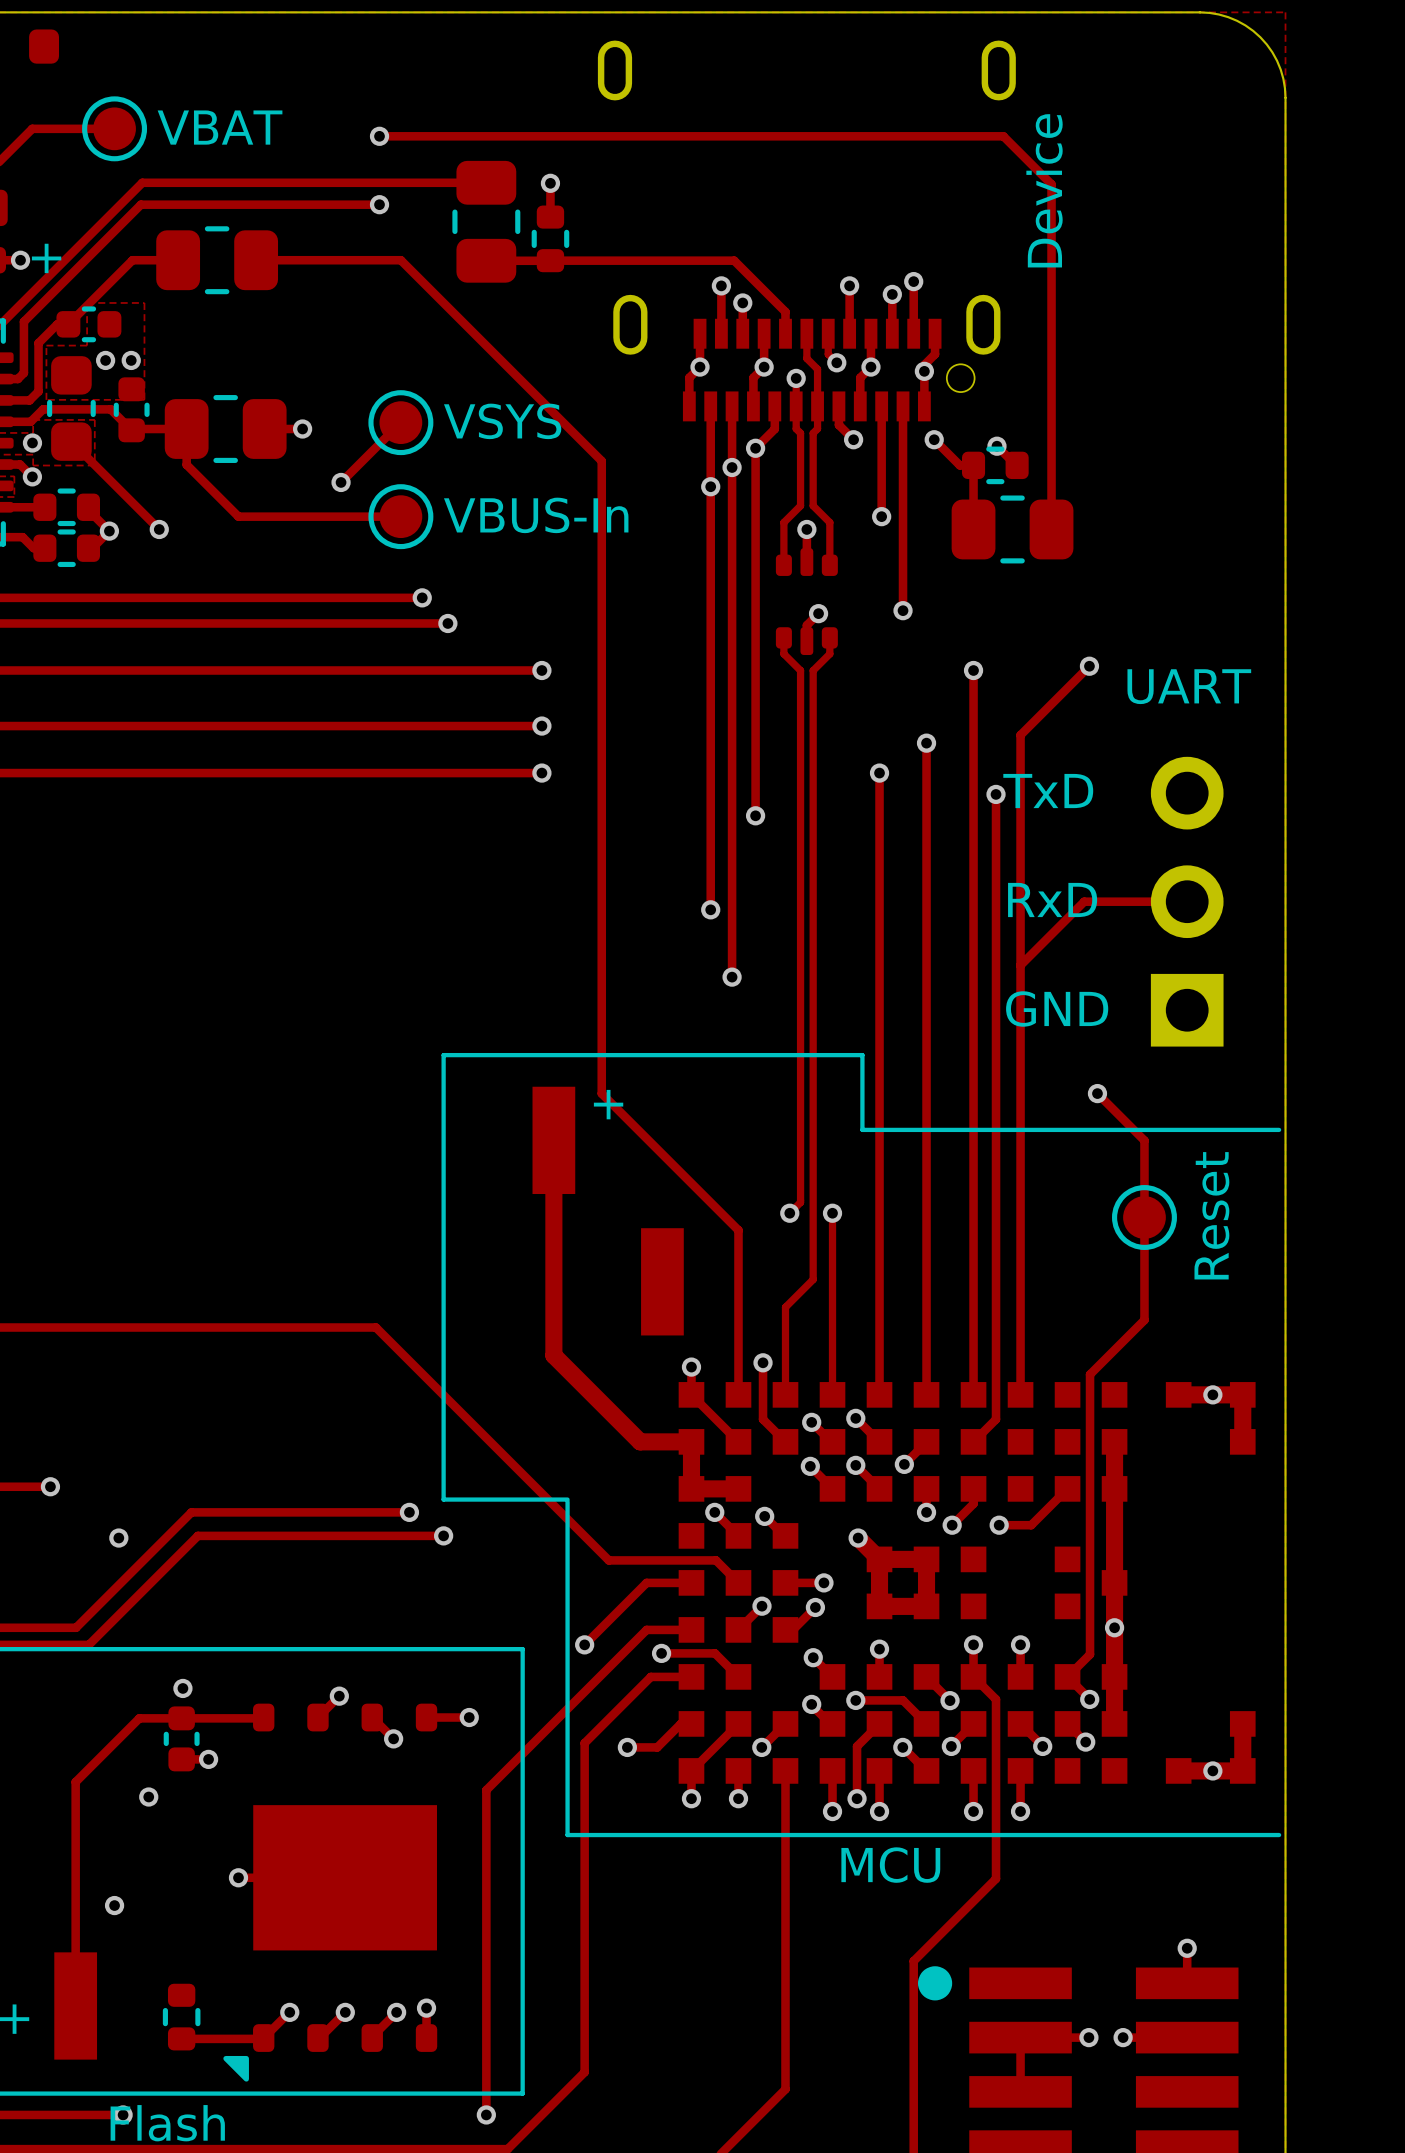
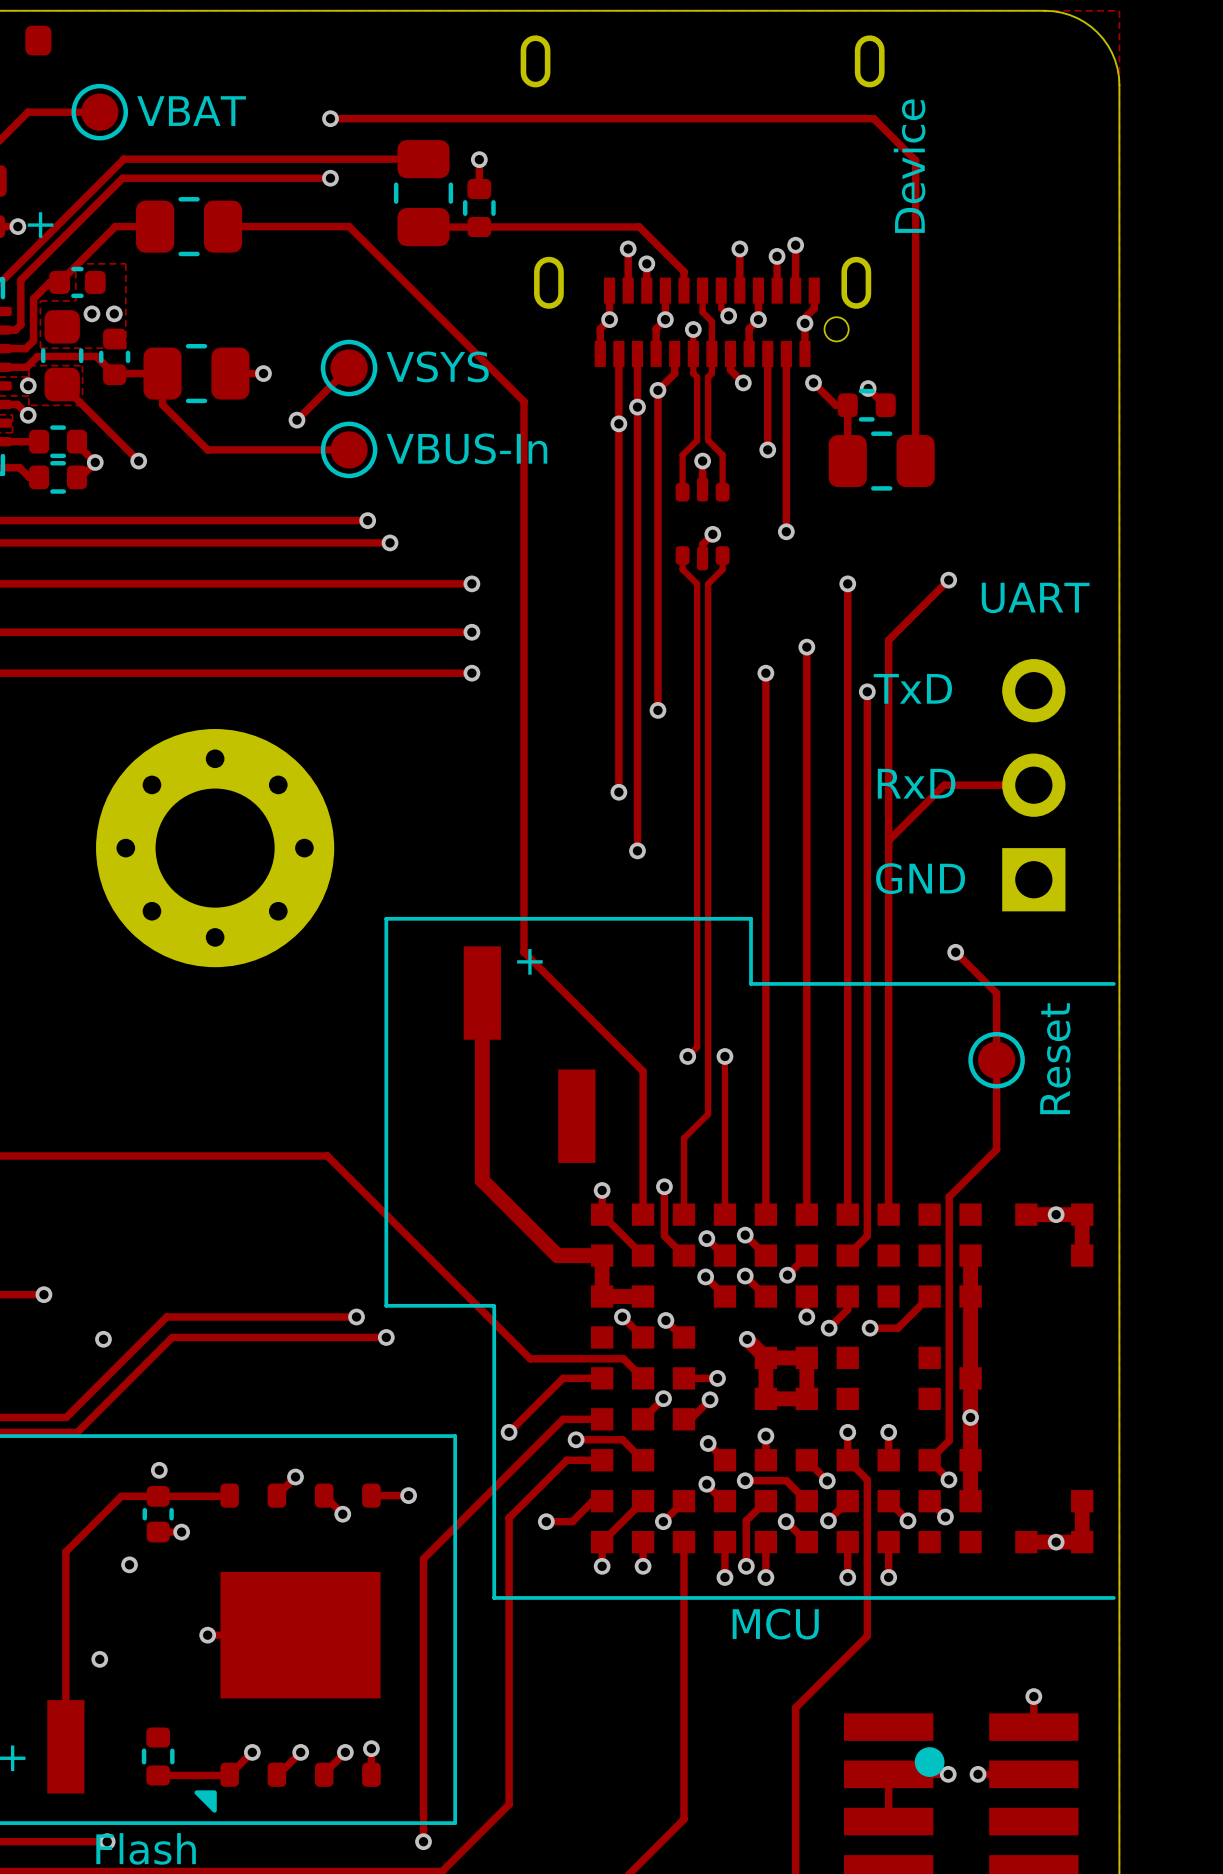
part: none -> (215, 848)
drawing position: (935, 1983) -> (929, 1762)

